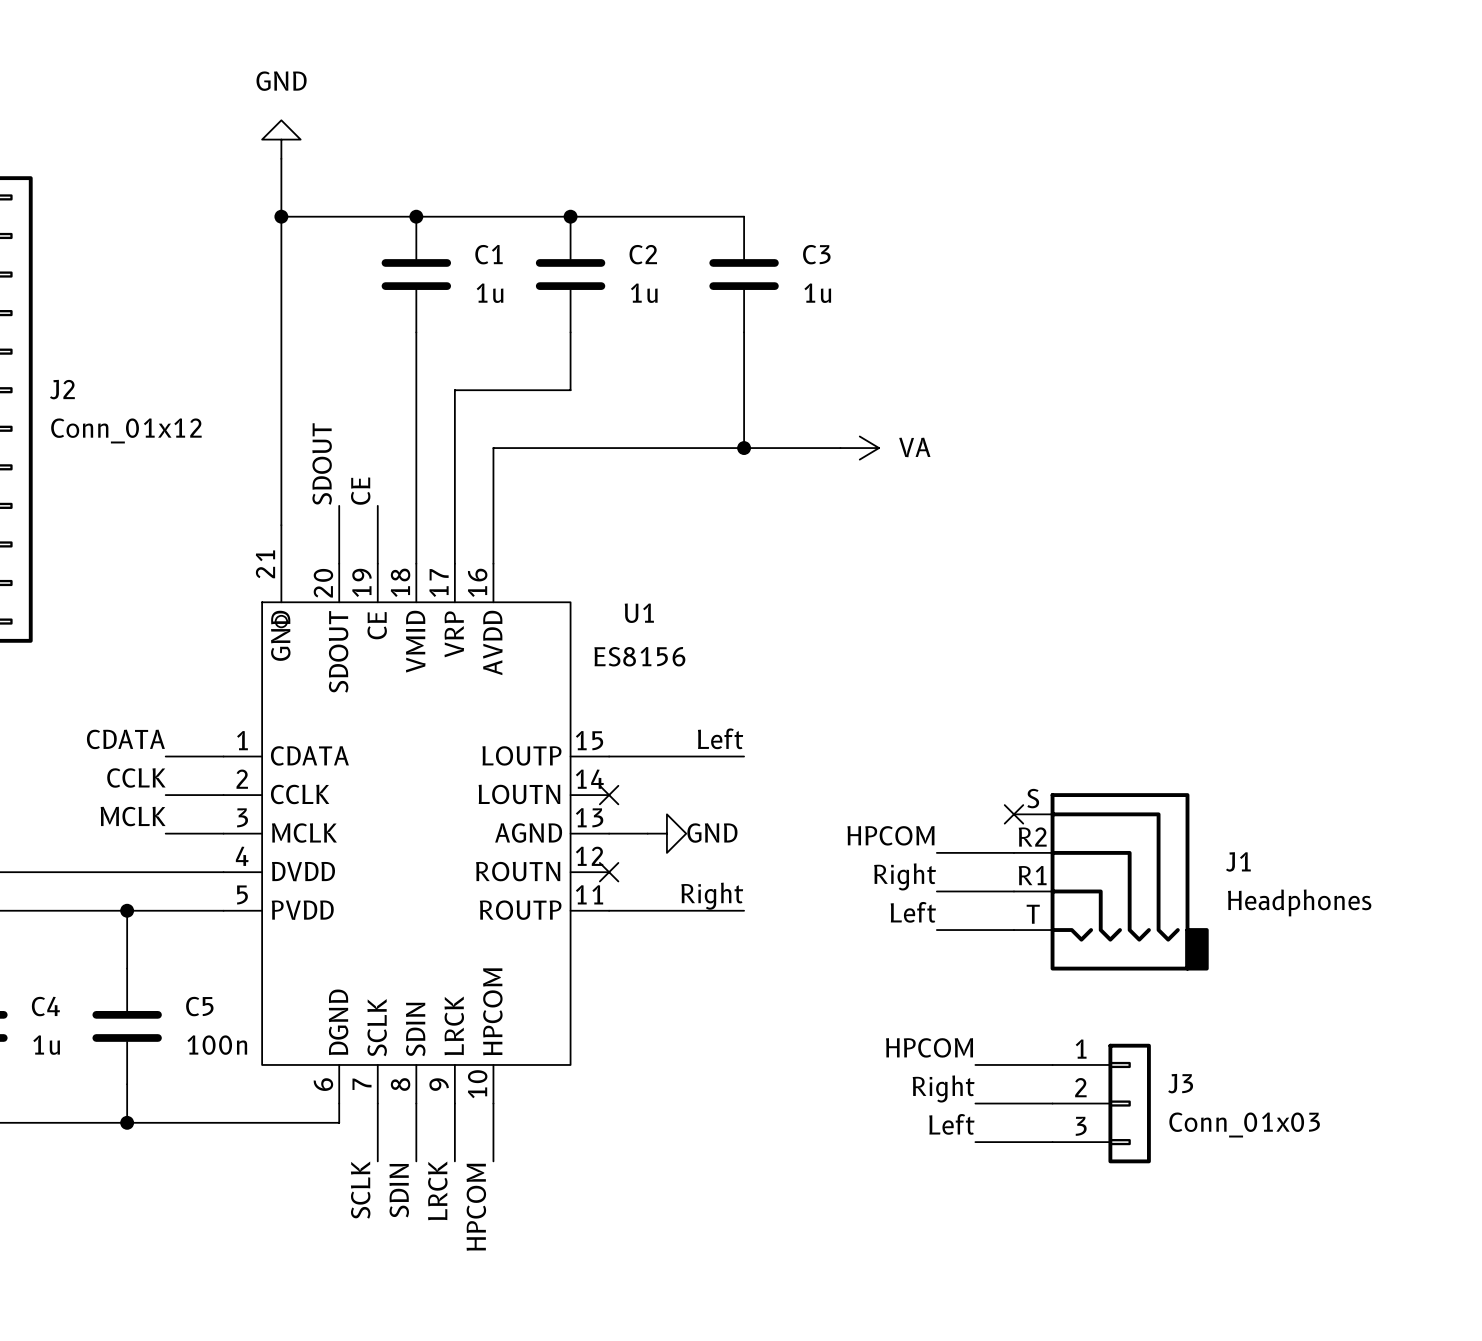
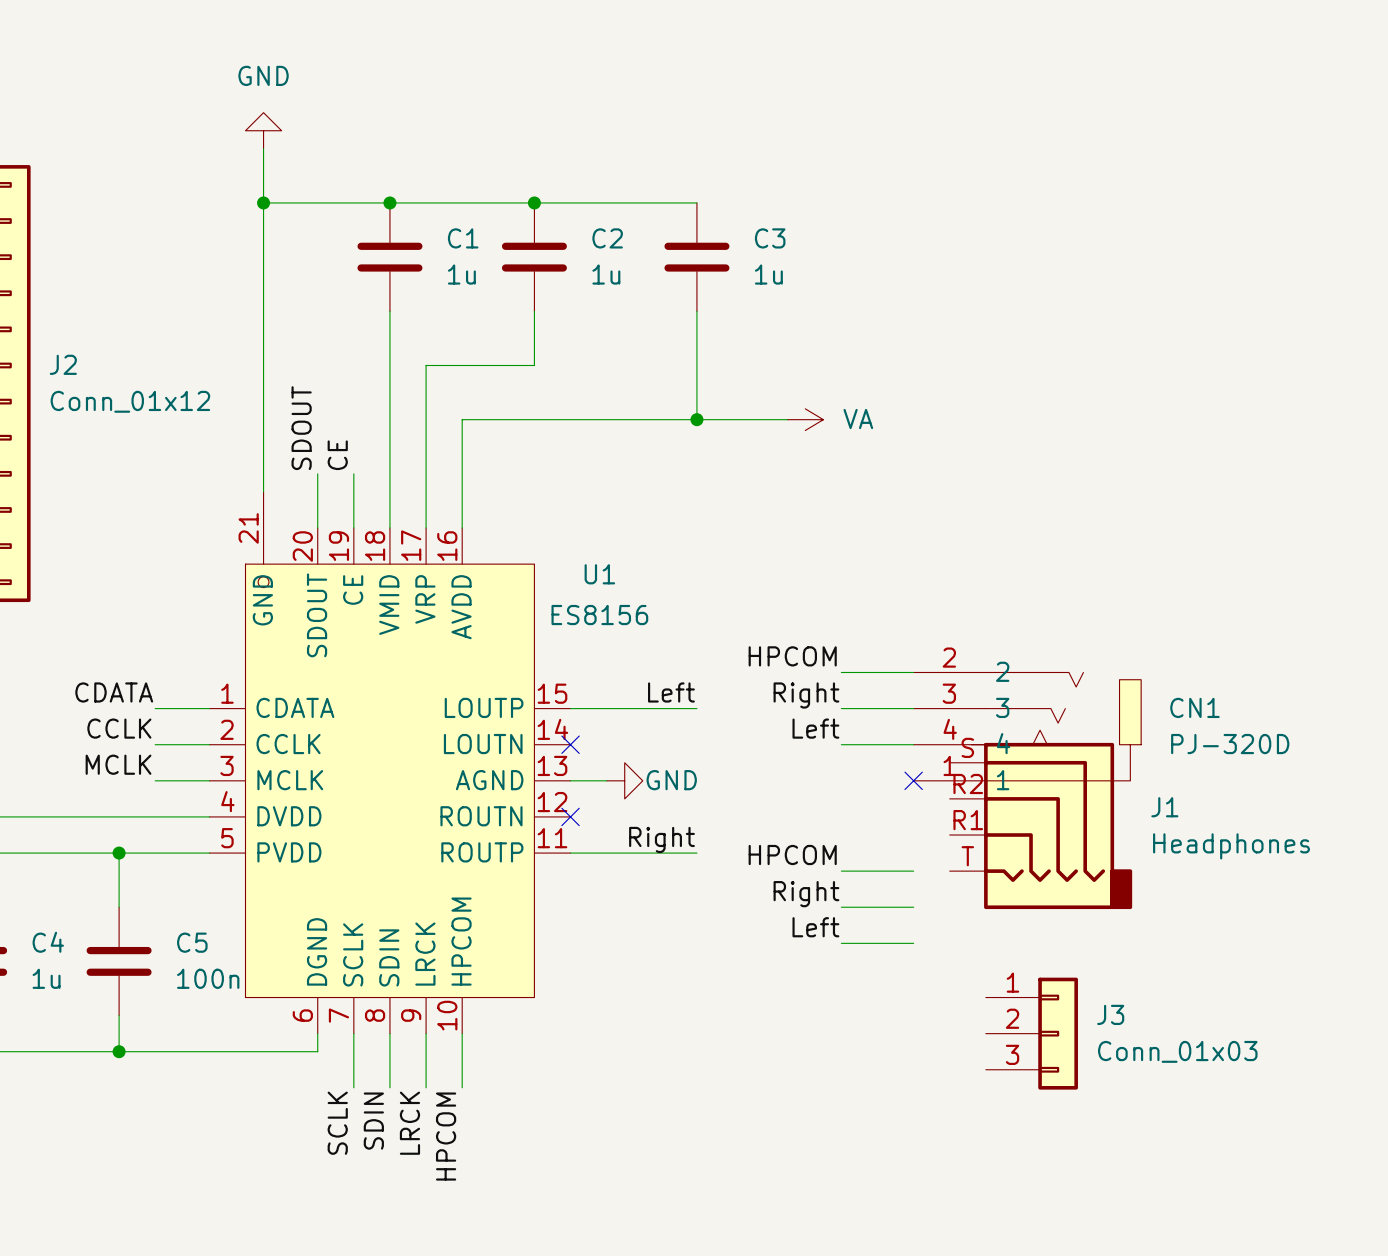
label: none -> HPCOM (792, 656)
label: none -> Right (806, 695)
CN1: none -> PJ-320D (1027, 726)
label: none -> Left (815, 728)
no-connect mark position: (1013, 814) -> (913, 780)
label: HPCOM (890, 835) -> none
wire: (936, 852) (1013, 852) -> (841, 907) (913, 907)
label: Right (905, 876) -> none
wire: (936, 891) (1013, 891) -> (841, 943) (913, 943)
label: none -> HPCOM (792, 855)
label: Left (913, 912) -> none
wire: (975, 930) (1013, 930) -> (841, 871) (877, 871)
label: none -> Right (806, 894)
label: none -> Left (815, 927)
label: HPCOM (929, 1047) -> none
wire: (975, 1064) (1052, 1064) -> (841, 672) (913, 672)
label: Right (943, 1088) -> none
wire: (975, 1103) (1052, 1103) -> (841, 708) (913, 708)
label: Left (951, 1124) -> none
wire: (975, 1142) (1052, 1142) -> (841, 744) (913, 744)

